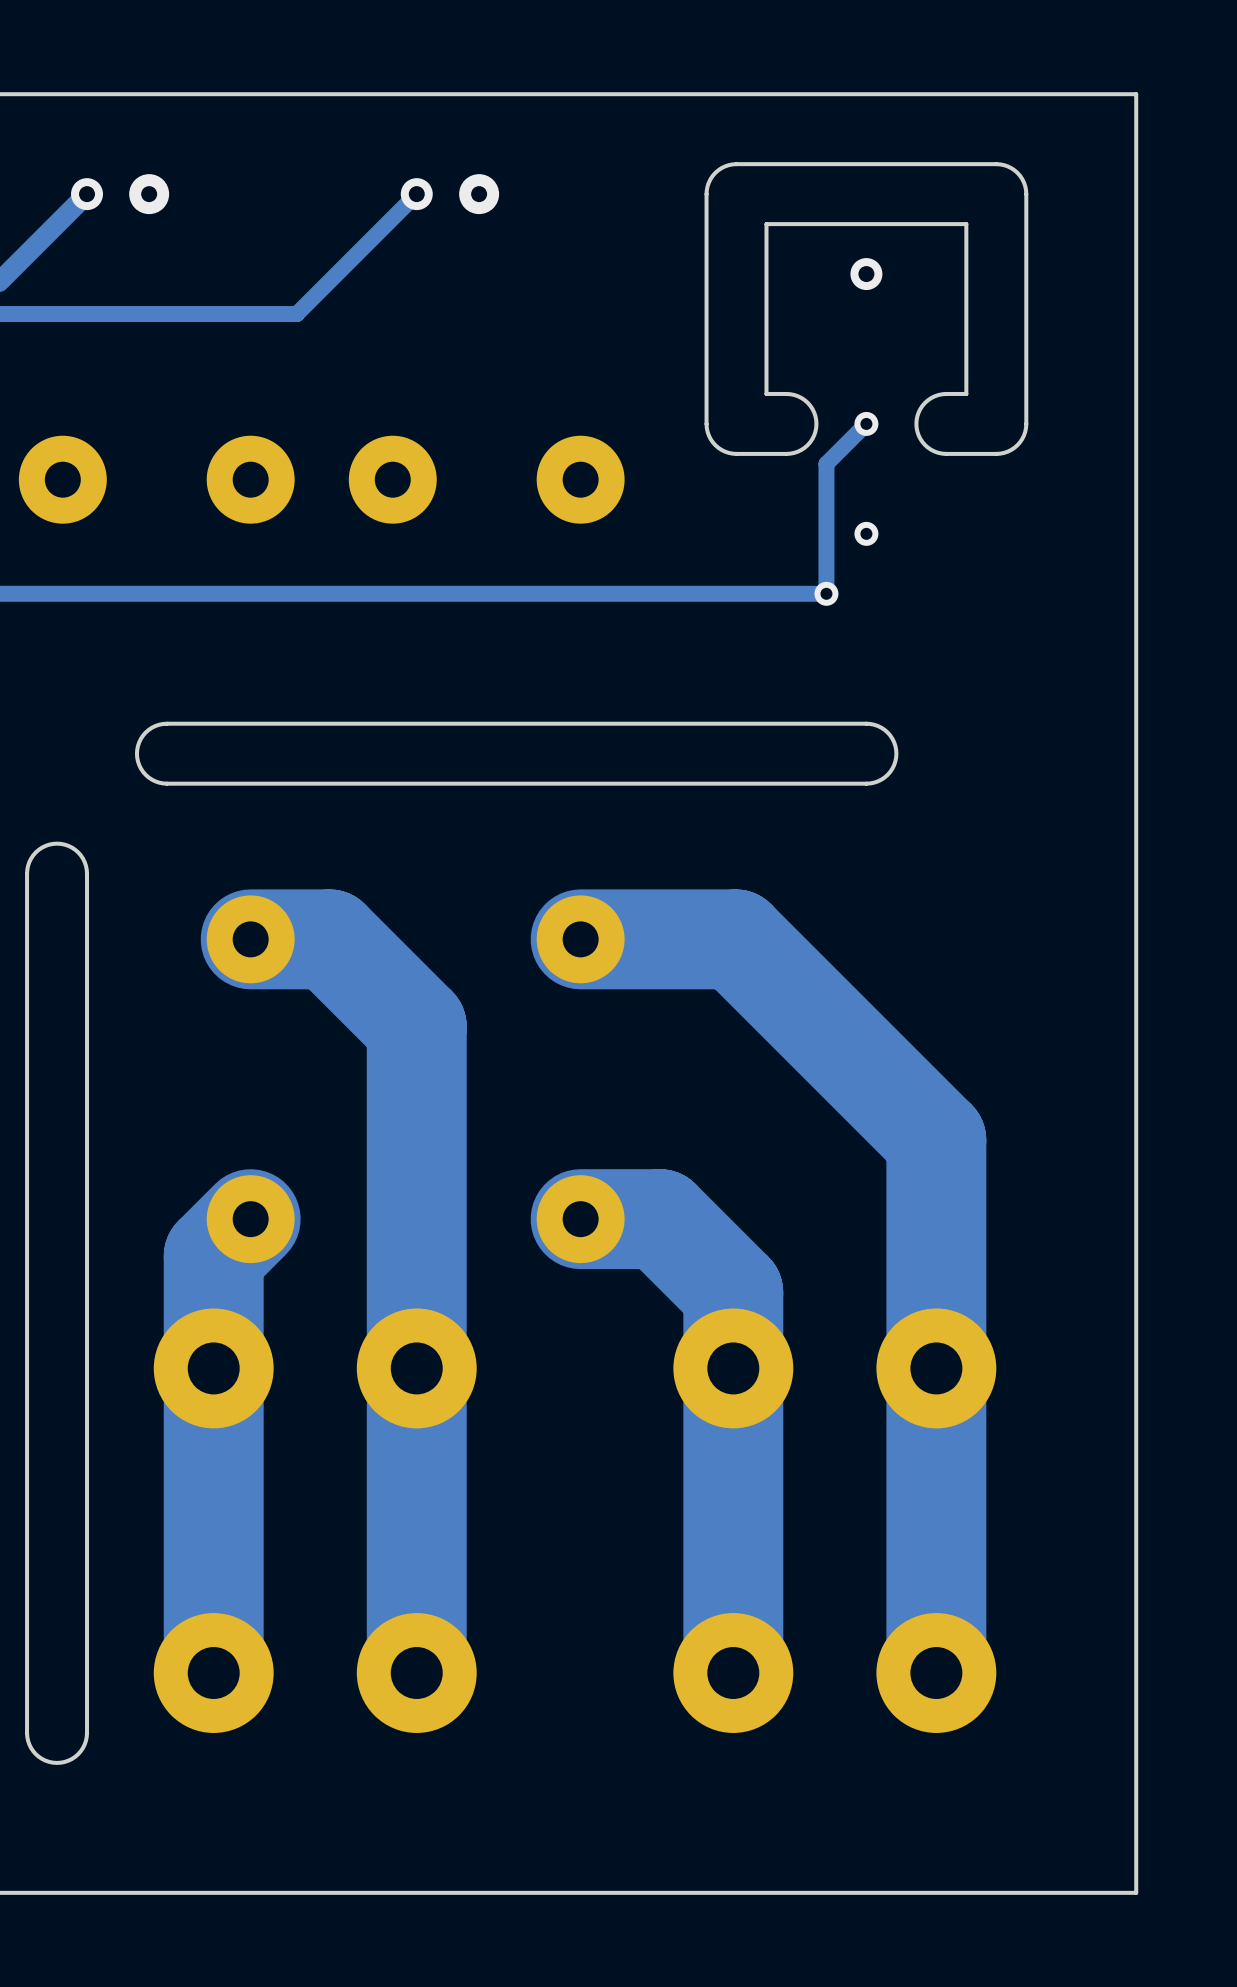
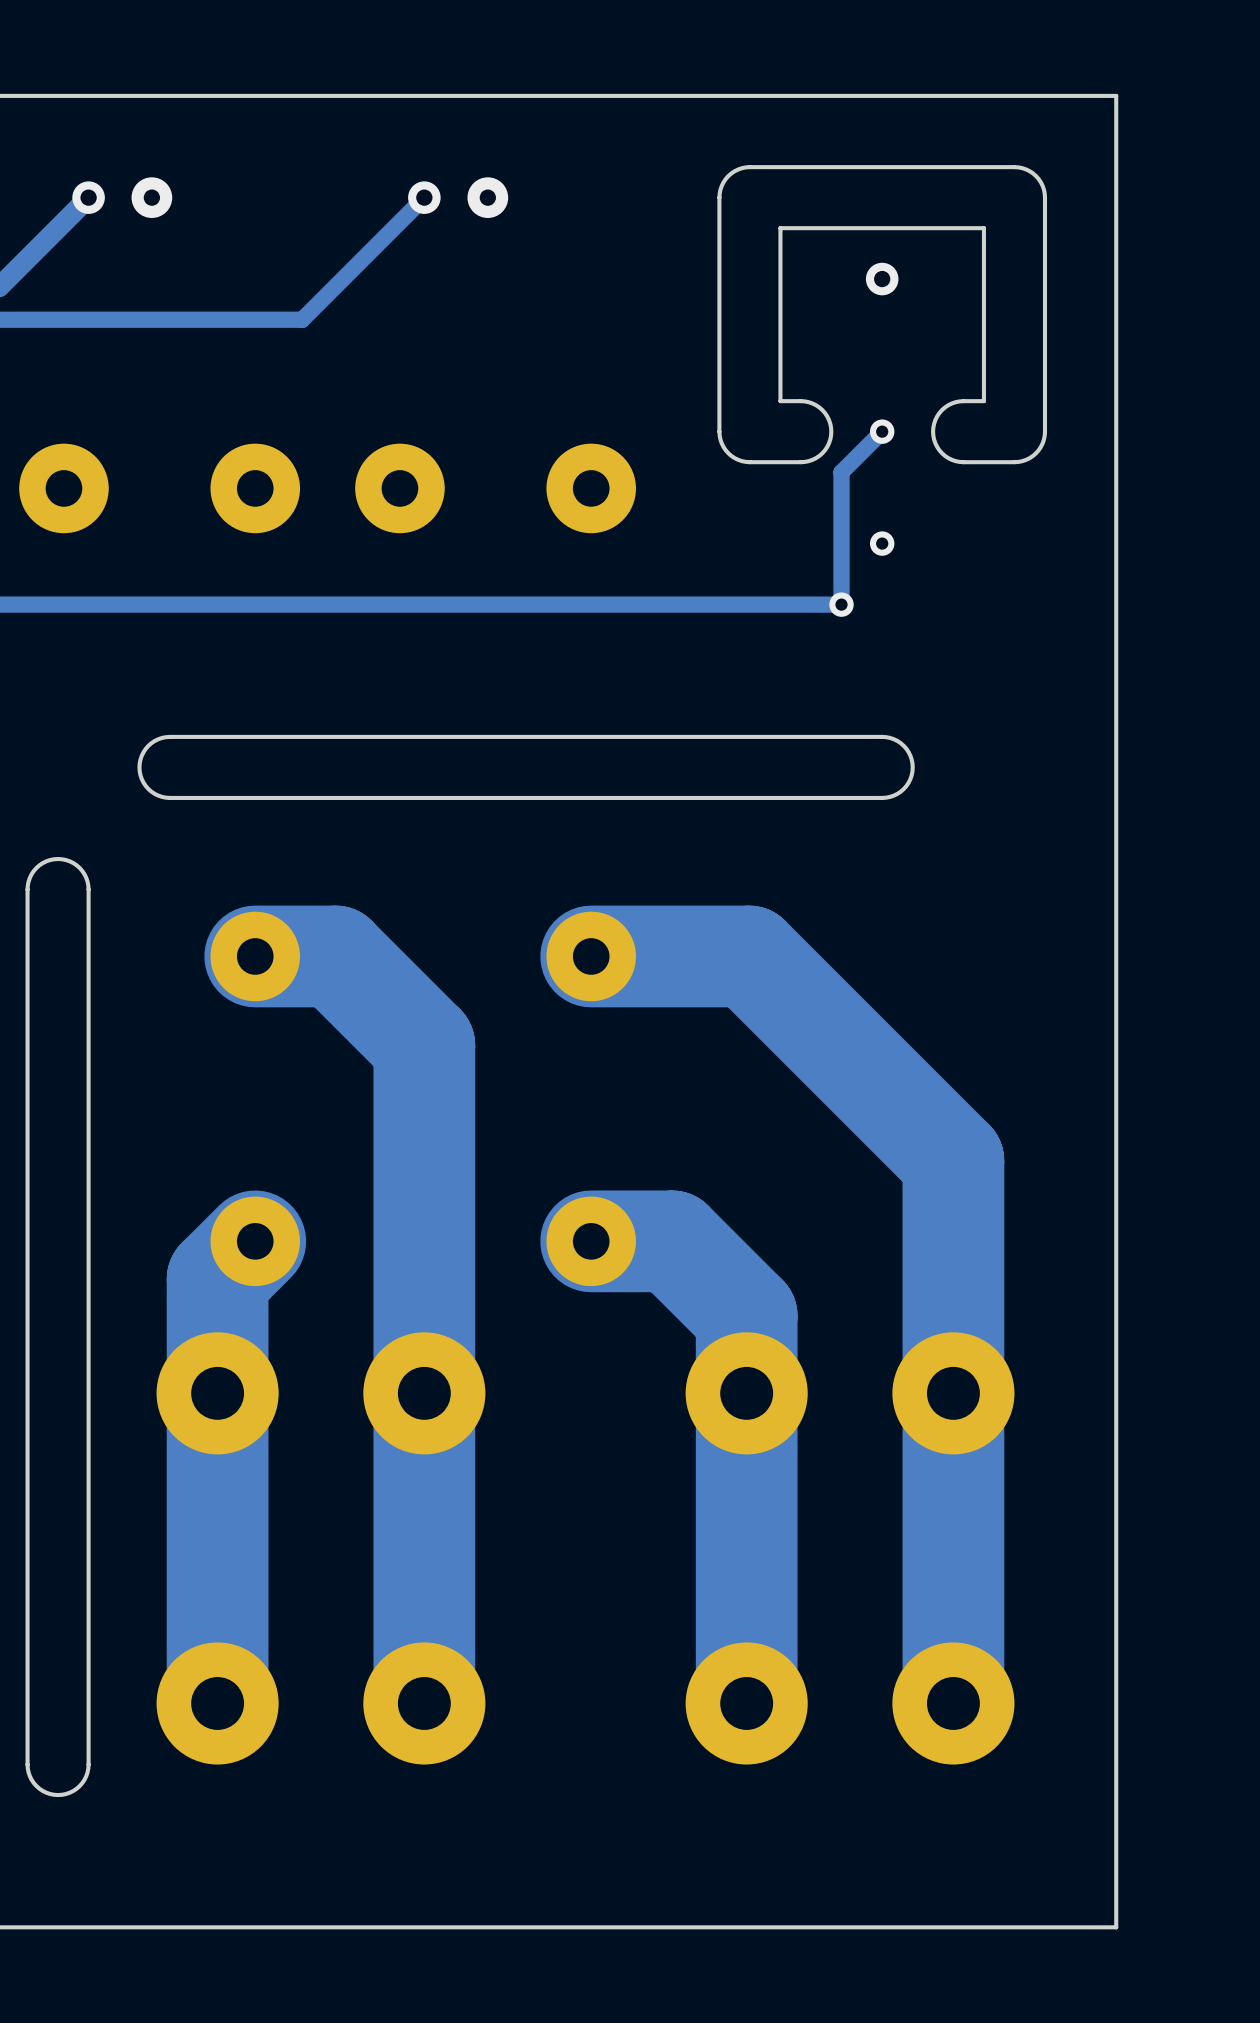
board edge: (1096, 94) (1136, 94) (1136, 1892) (1096, 1892) -> (1116, 95) (1116, 1927)

